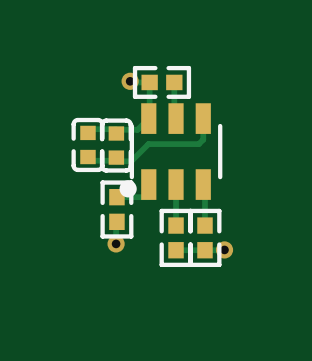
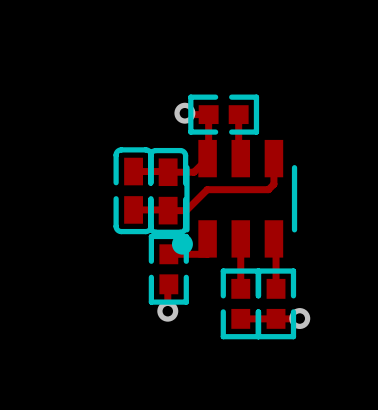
part footprint: [71, 117, 105, 173] -> [113, 147, 154, 235]
part footprint: [99, 118, 133, 173] -> [148, 147, 189, 235]

